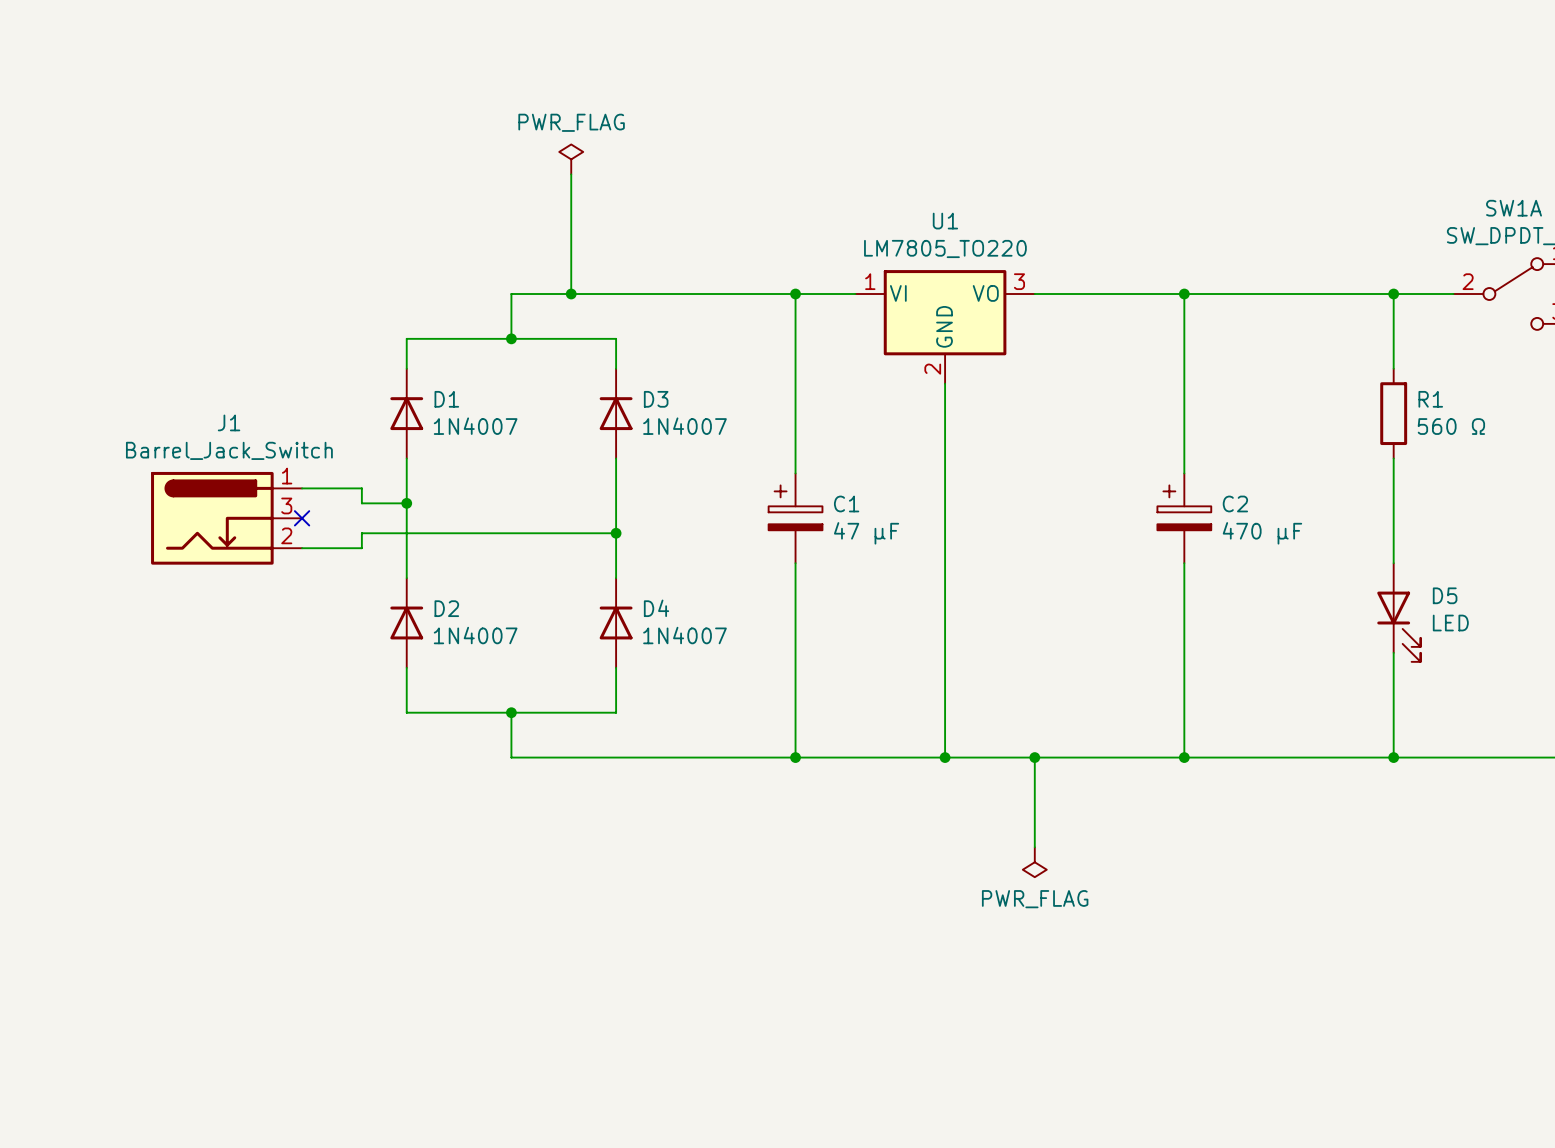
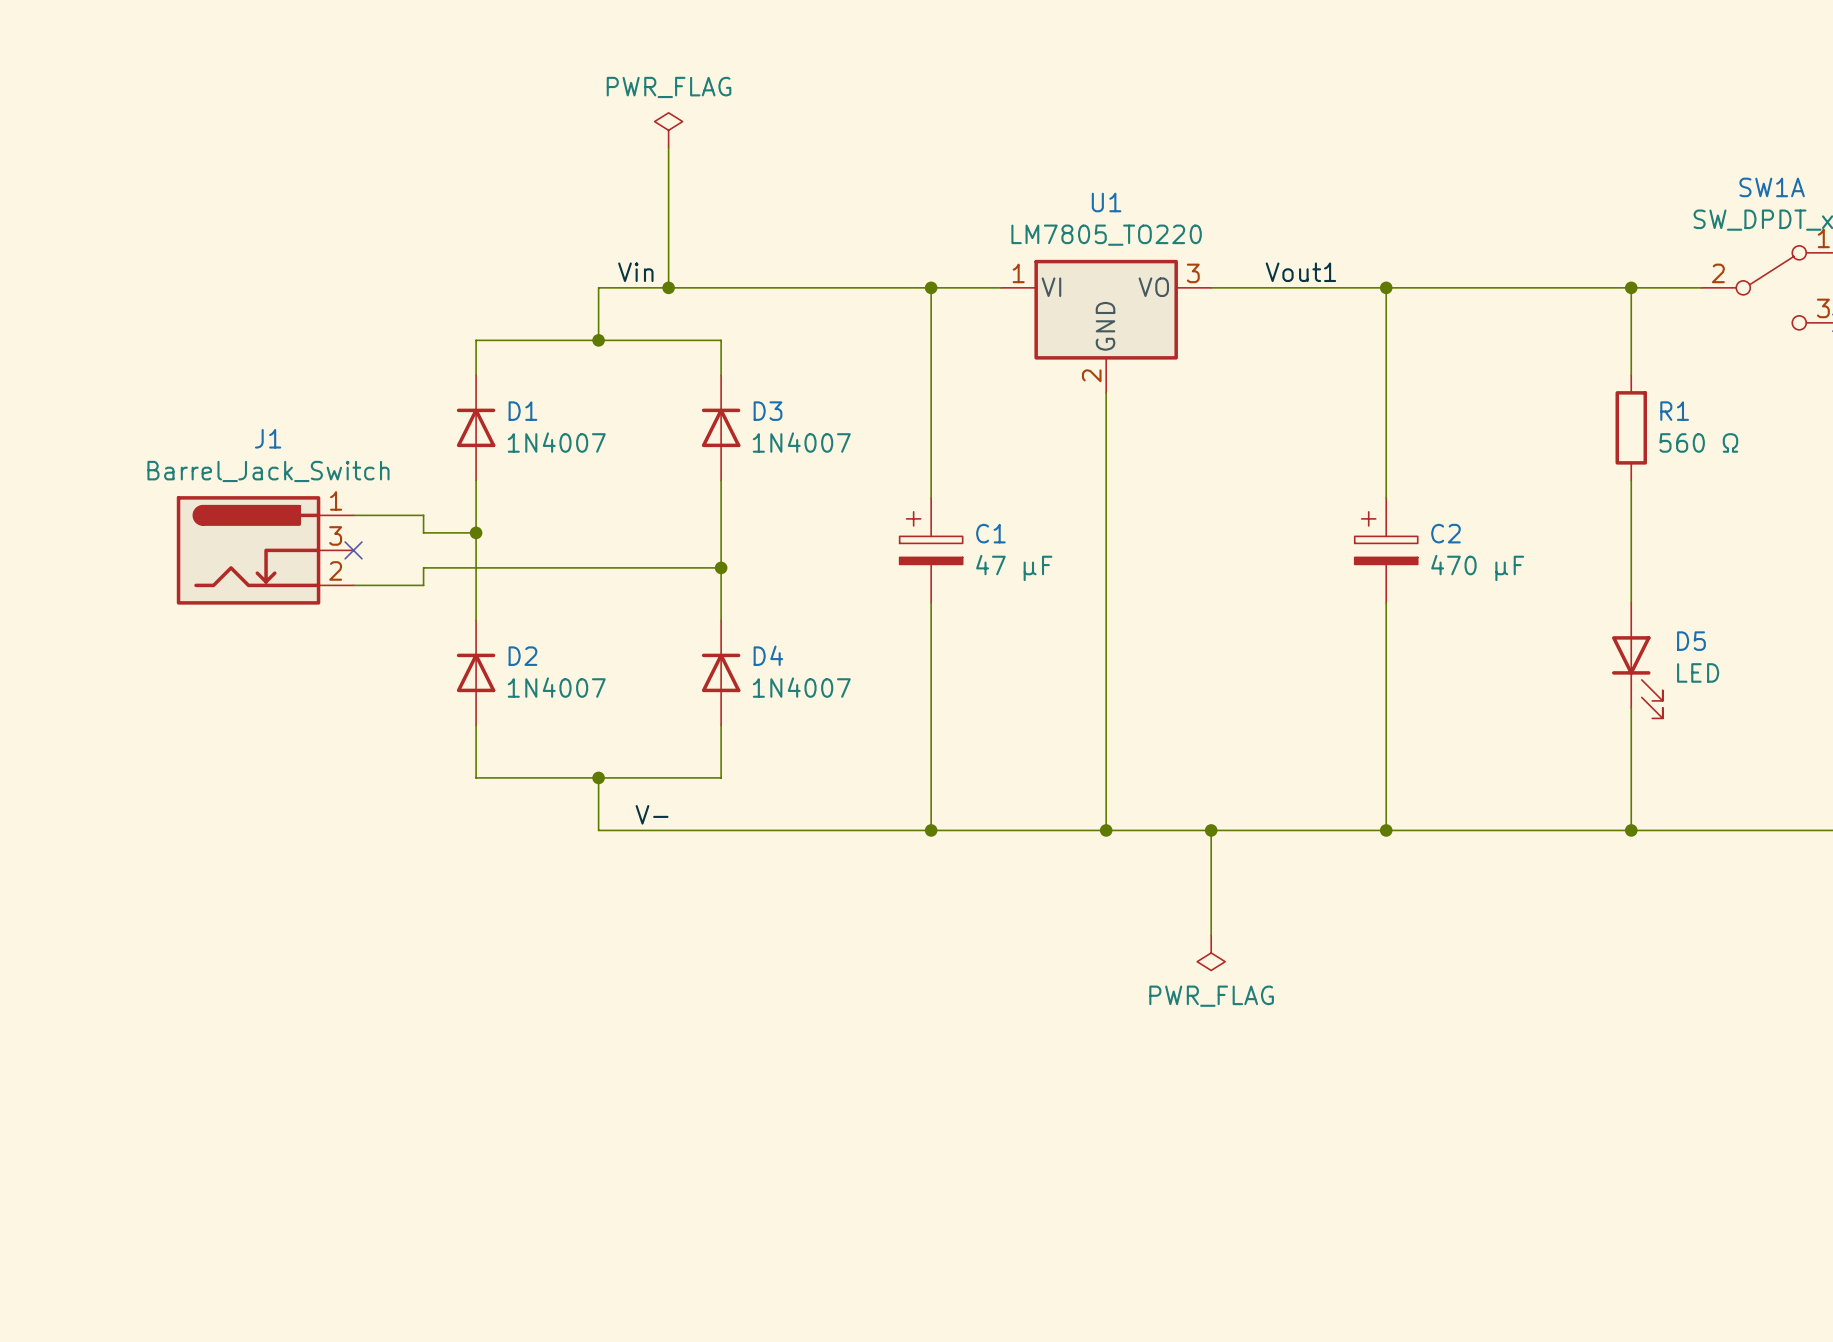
label: none -> Vin (635, 272)
label: none -> Vout1 (1300, 272)
label: none -> V- (652, 814)

